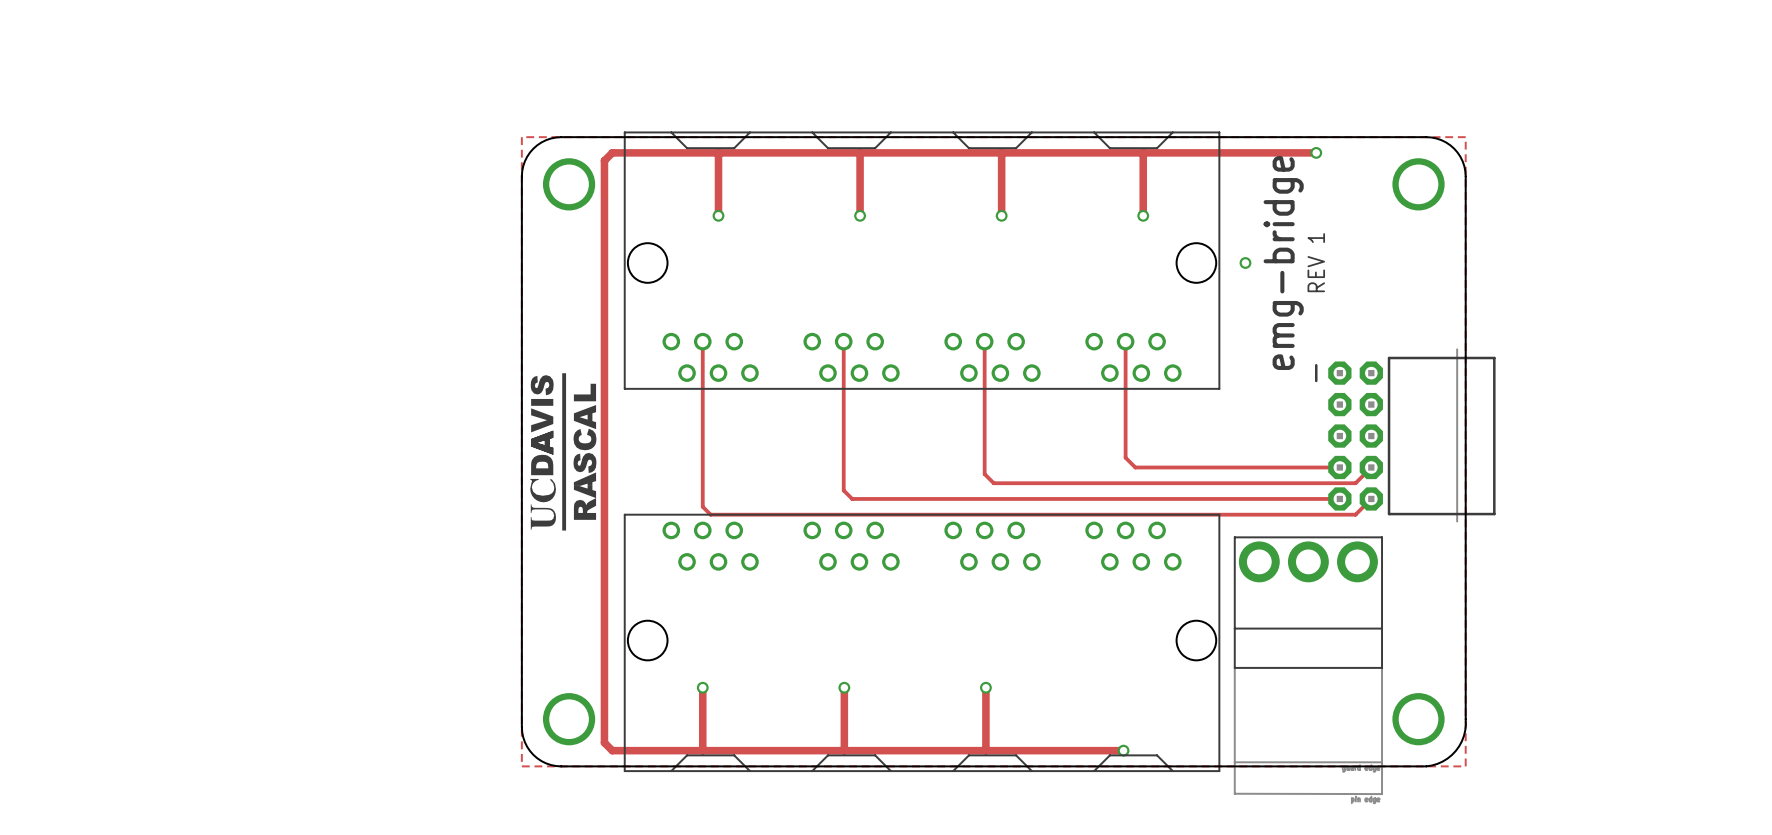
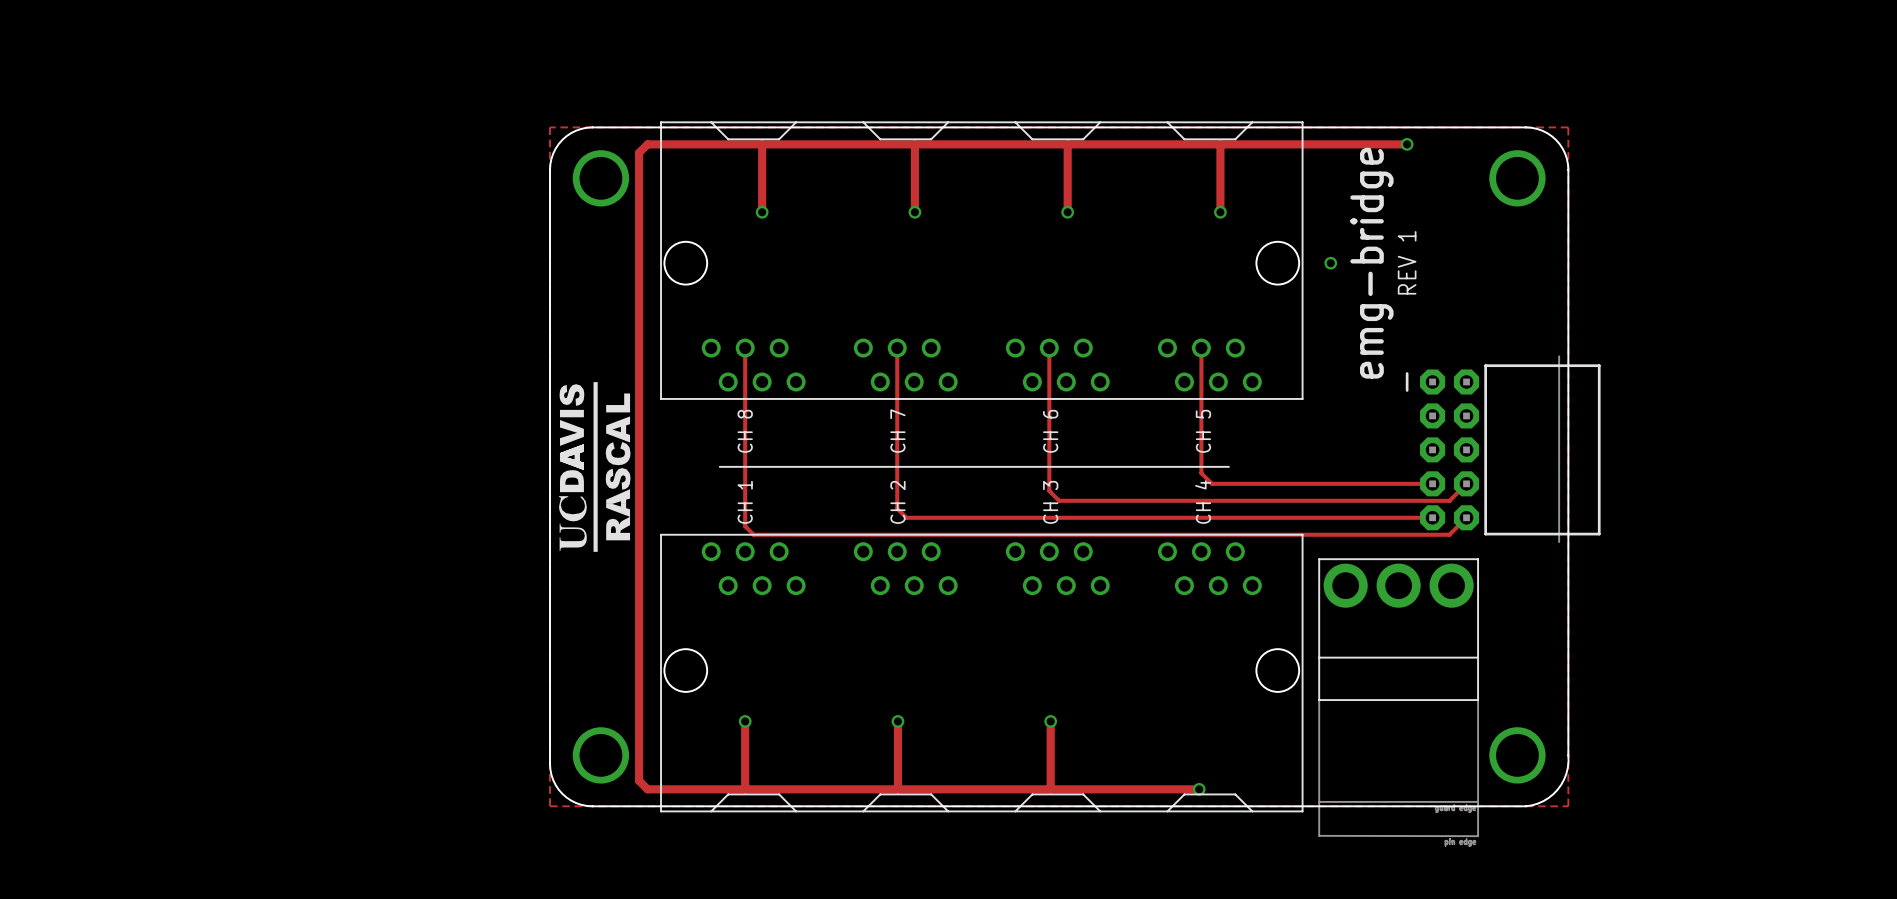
text: none -> CH 8 (745, 431)
text: none -> CH 7 (897, 431)
text: none -> CH 6 (1050, 431)
text: none -> CH 5 (1203, 431)
line: none -> (719, 466) (1228, 466)
text: none -> CH 1 (745, 502)
text: none -> CH 2 (897, 502)
text: none -> CH 3 (1050, 502)
text: none -> CH 4 (1203, 502)

